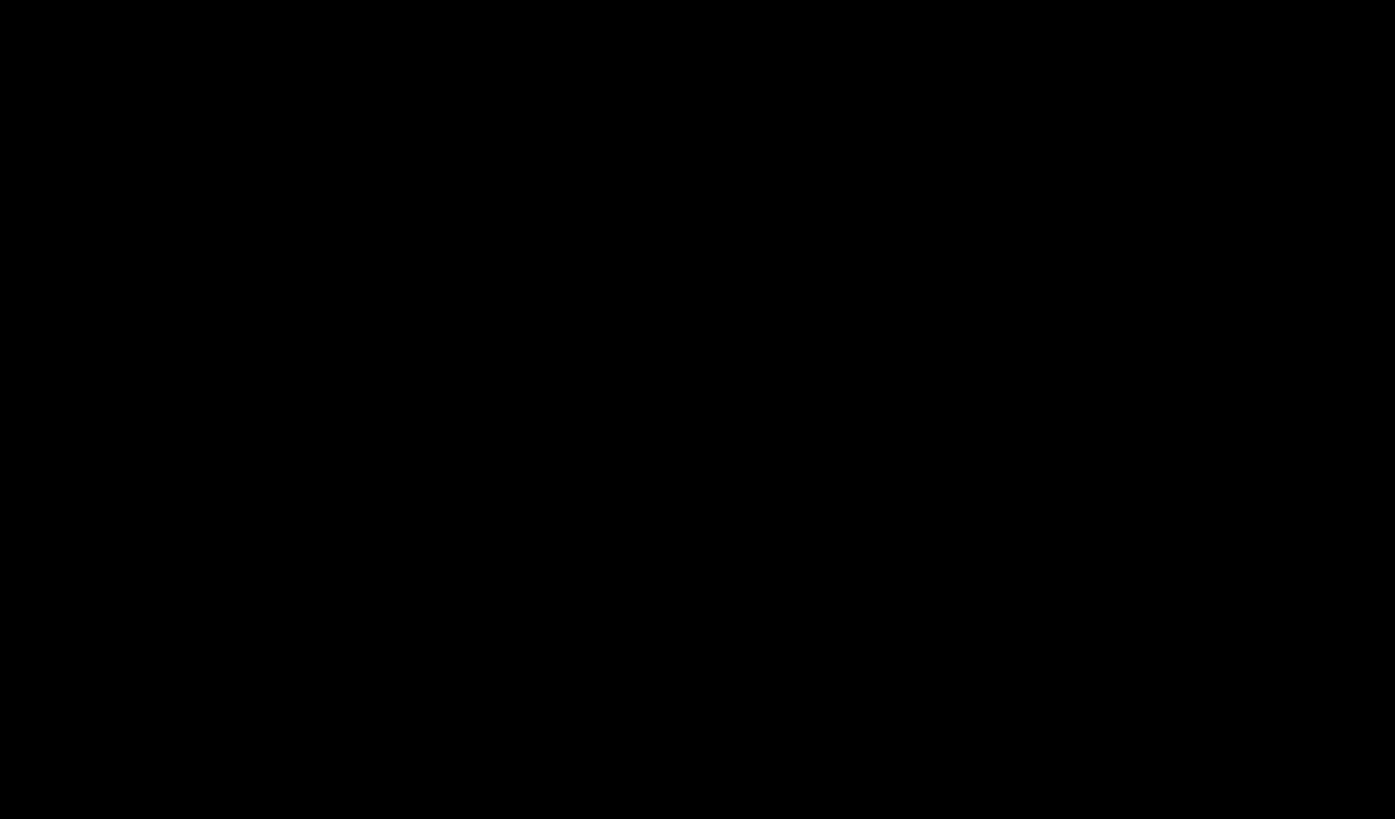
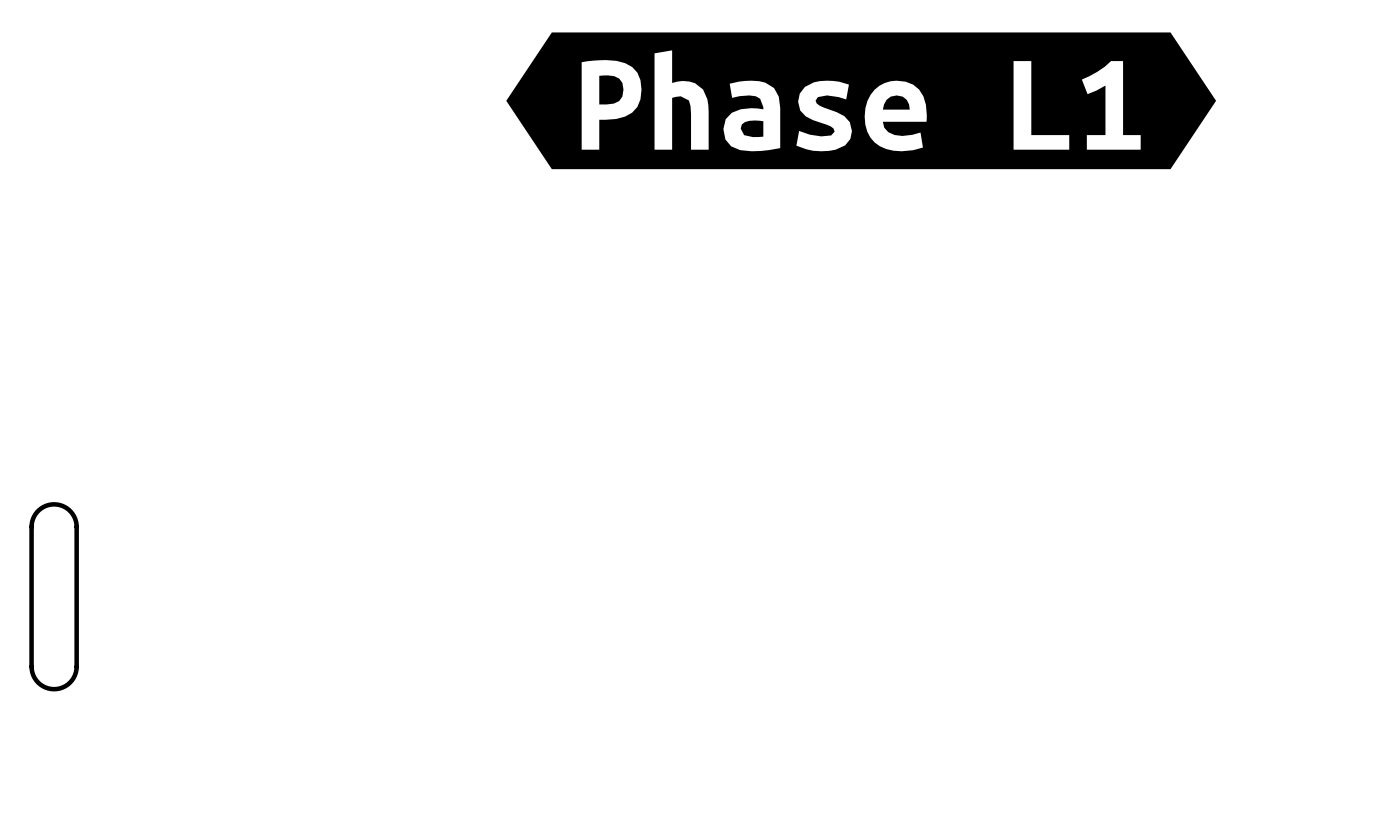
drawing: none -> [506, 32, 1217, 170]
board edge: none -> (31, 526) (31, 669) (34, 677) (40, 684) (48, 688) (57, 689) (70, 682) (76, 669) (76, 524) (74, 516) (66, 508) (51, 504) (37, 511) (31, 526)

